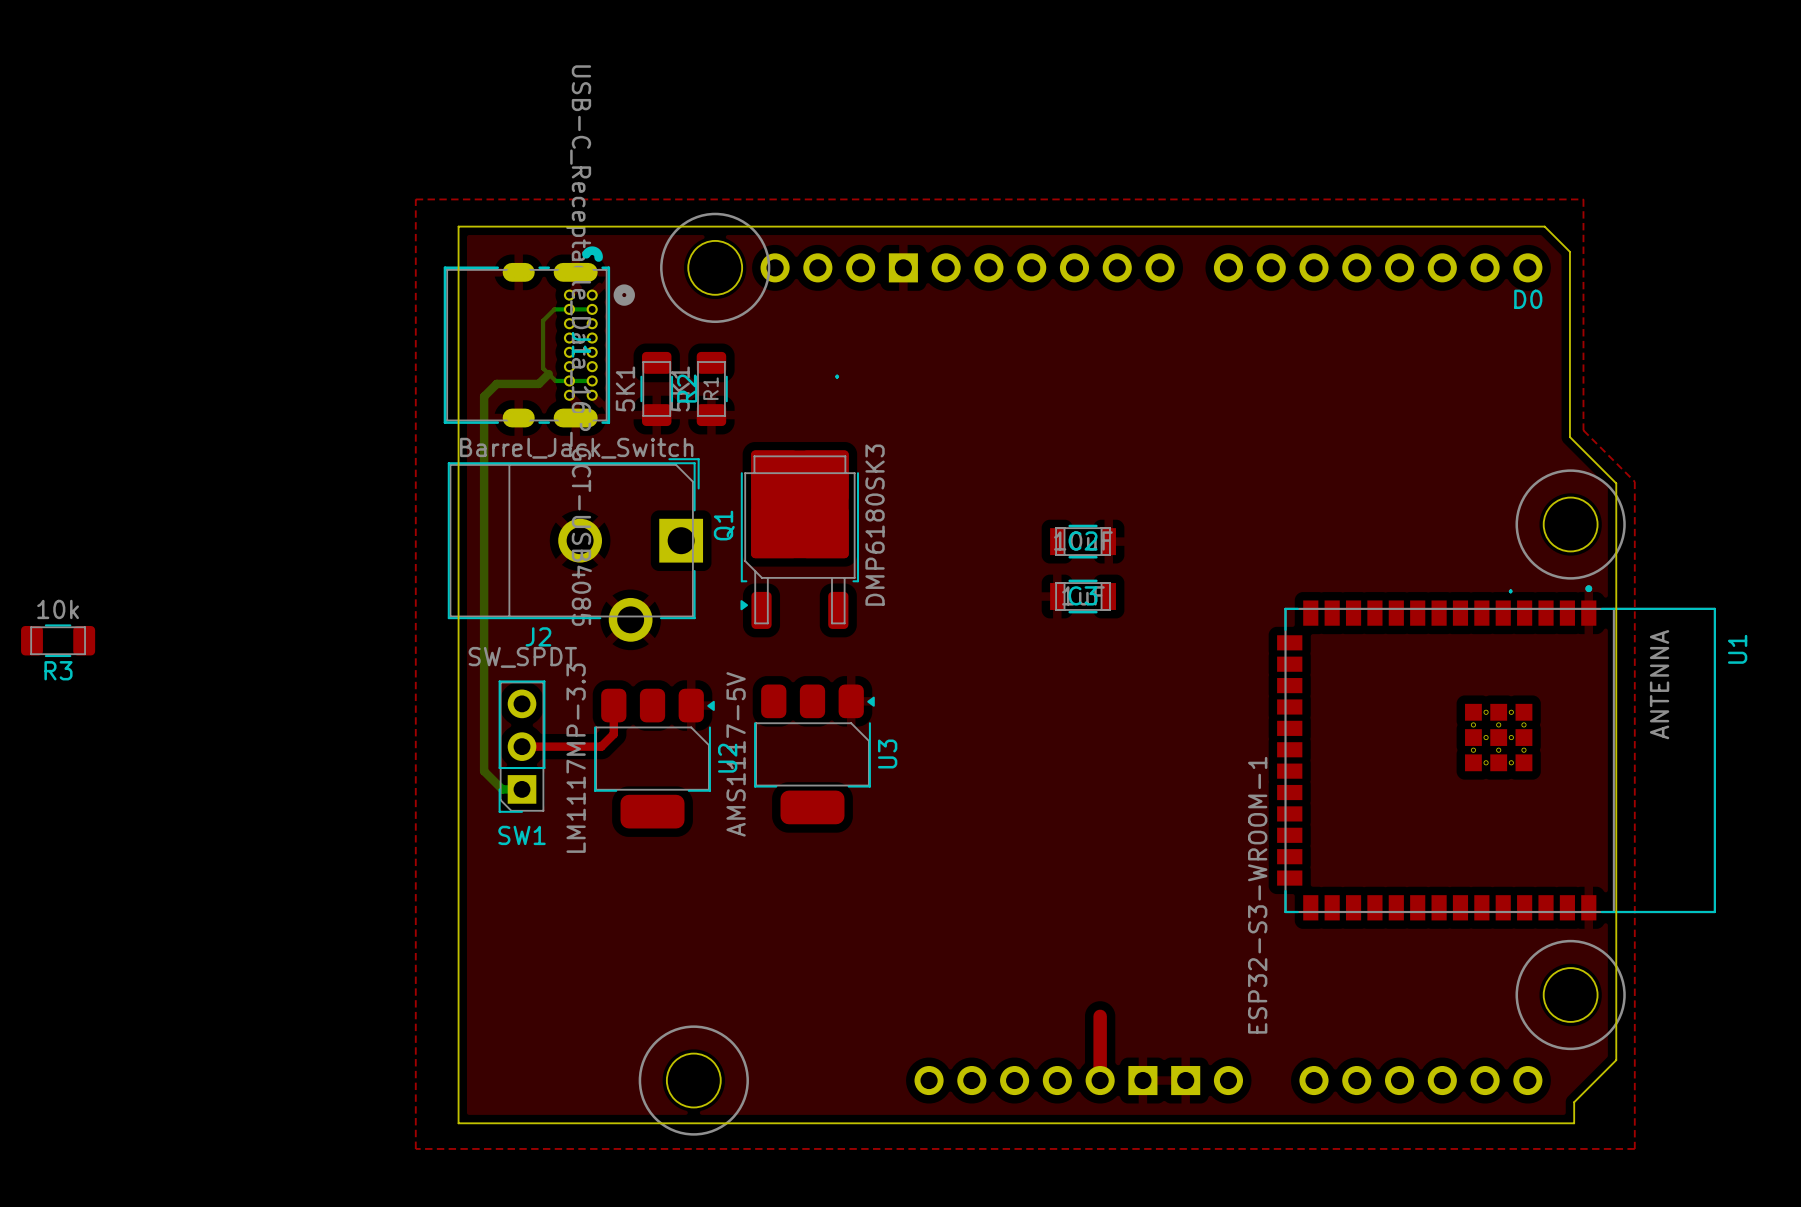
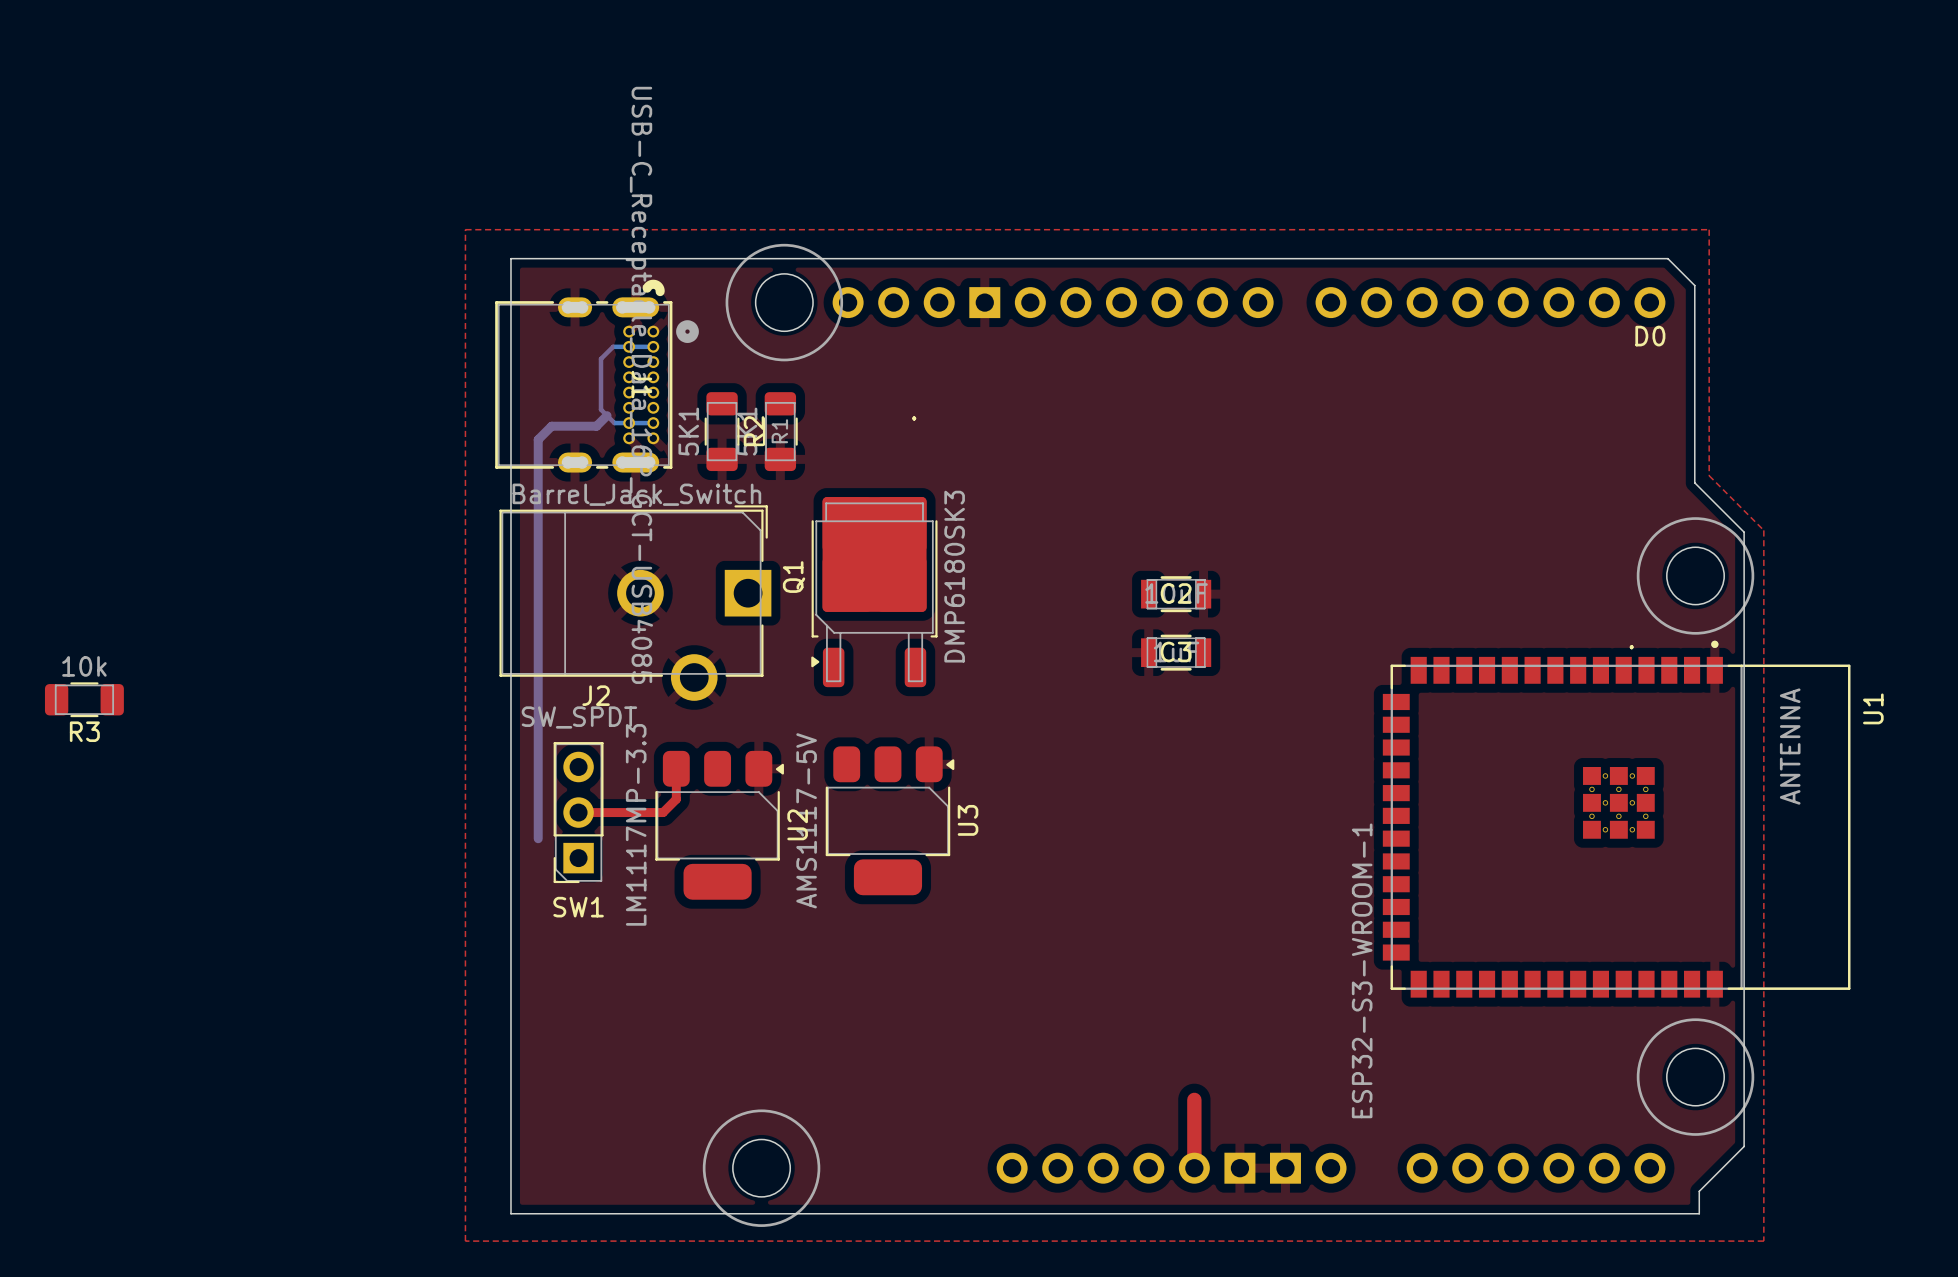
bottom track: (484, 771) (502, 789) (522, 789) -> none

